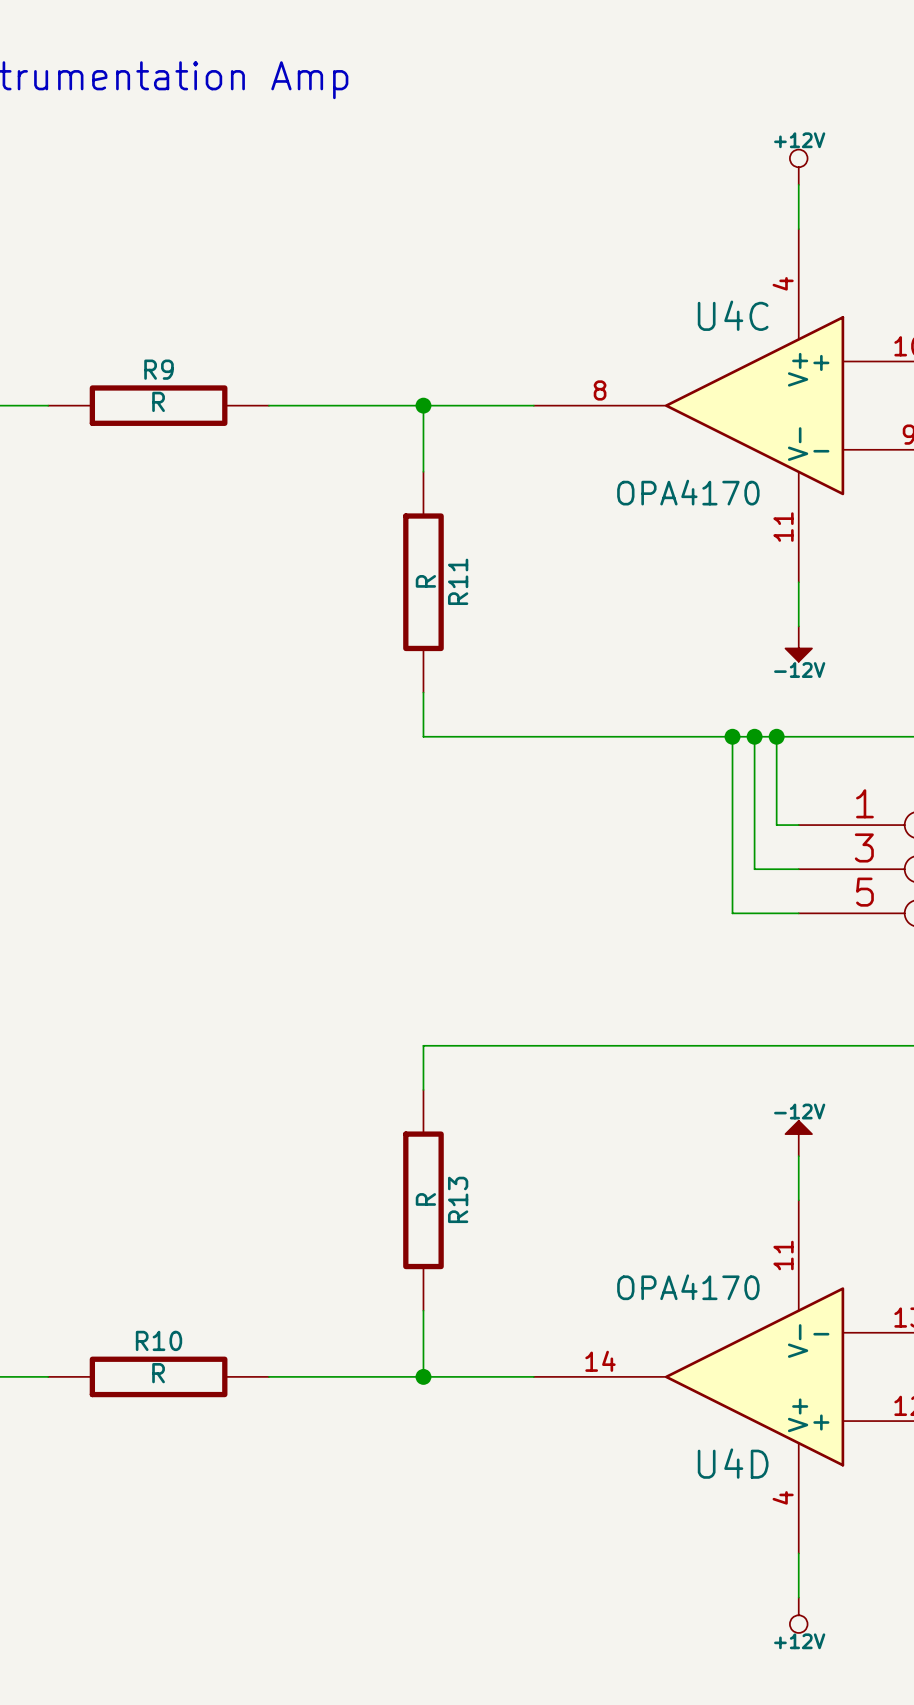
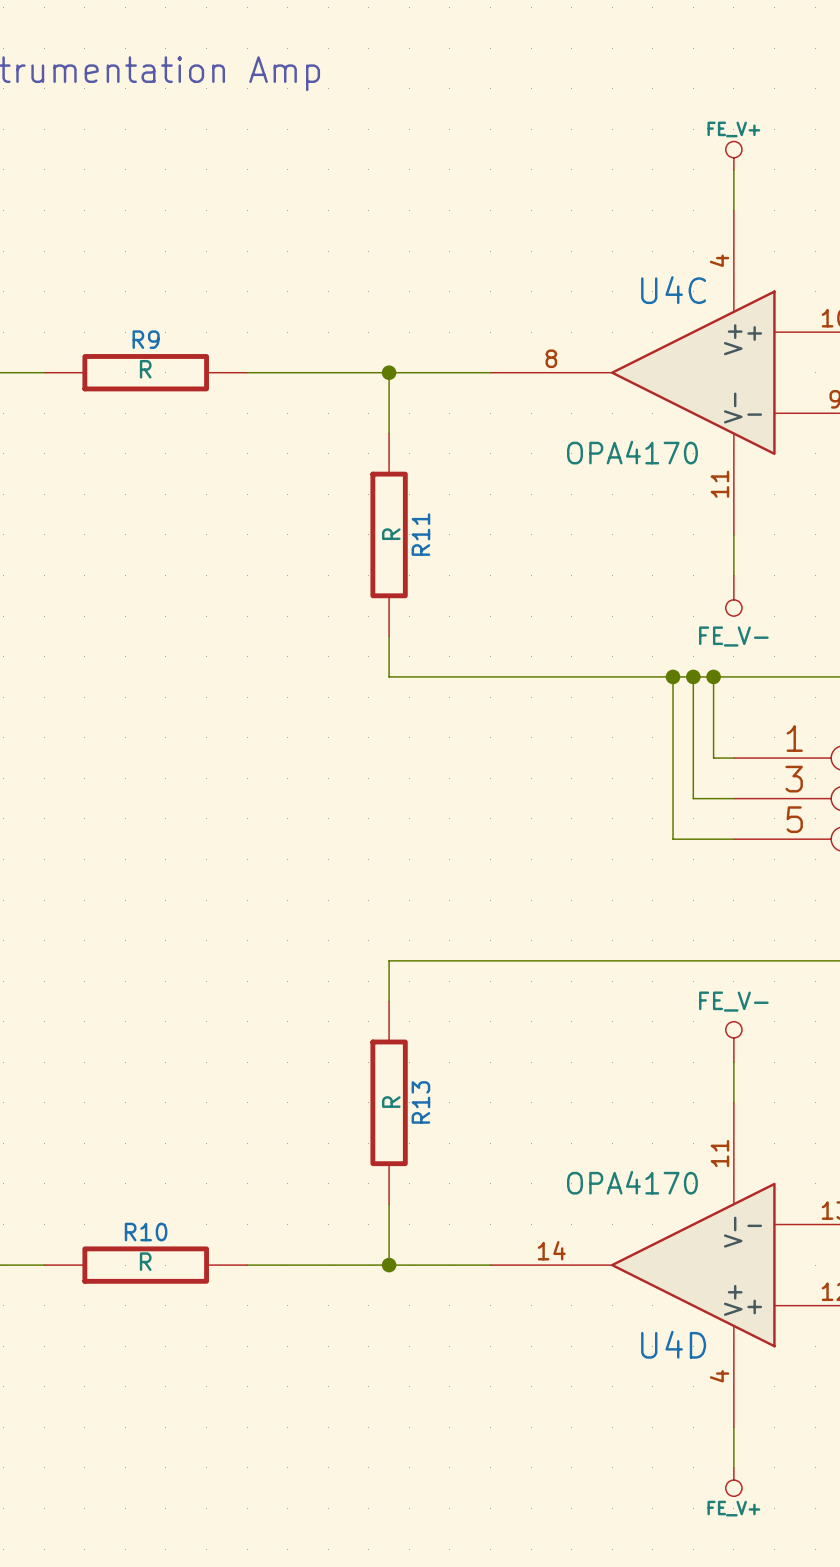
power symbol: +12V (798, 167) -> FE_V+ (733, 155)
power symbol: -12V (798, 644) -> FE_V- (733, 595)
power symbol: -12V (798, 1138) -> FE_V- (733, 1041)
power symbol: +12V (798, 1615) -> FE_V+ (733, 1482)

